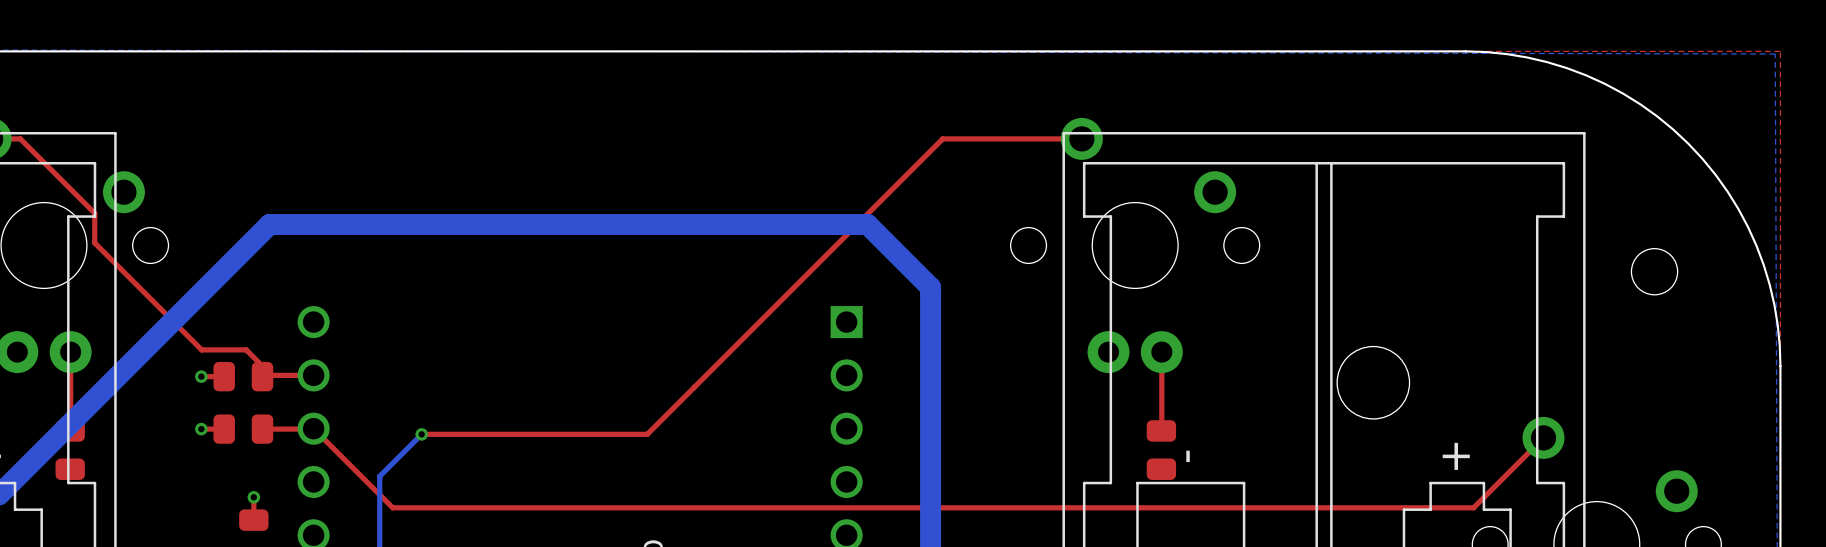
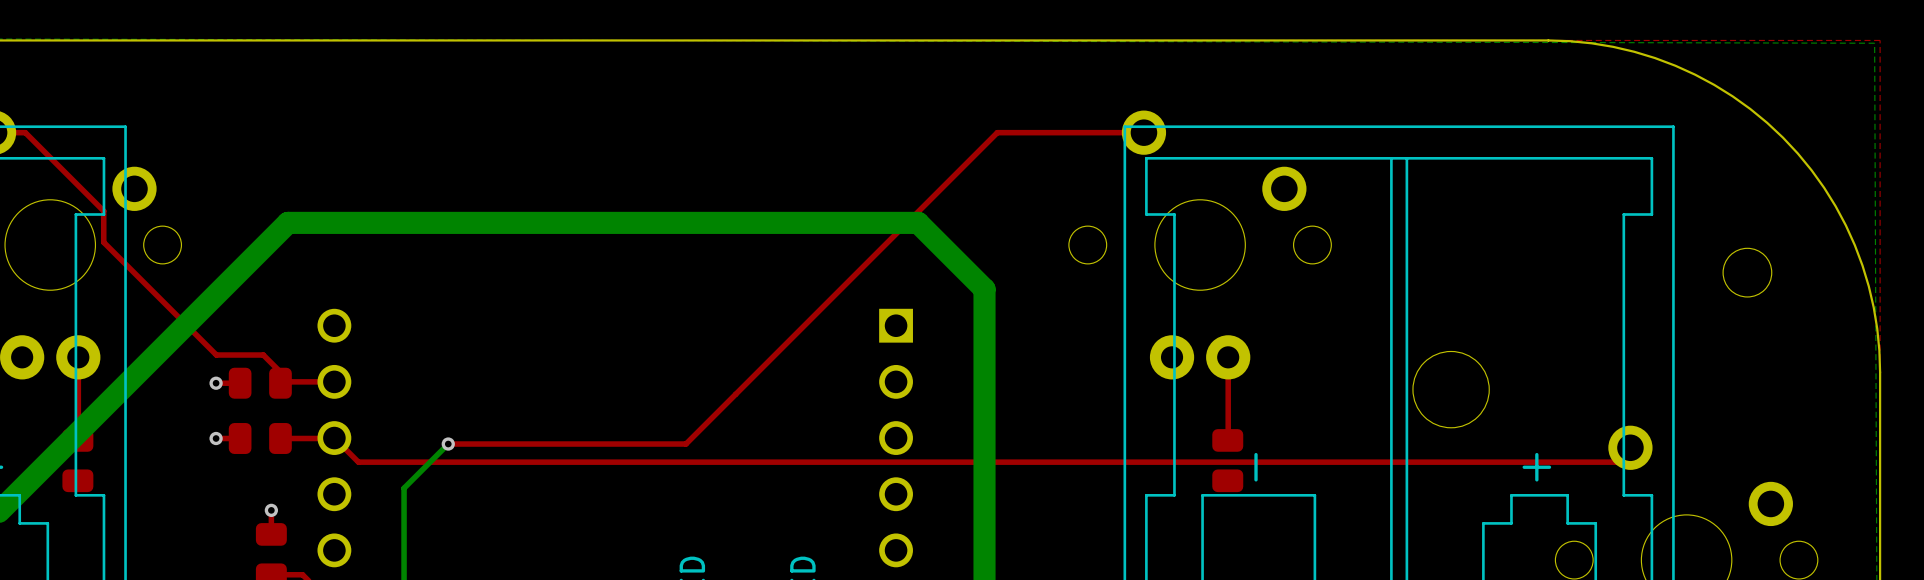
top track: (1529, 451) (1473, 507) (392, 507) (336, 451) -> (1616, 462) (358, 462)

